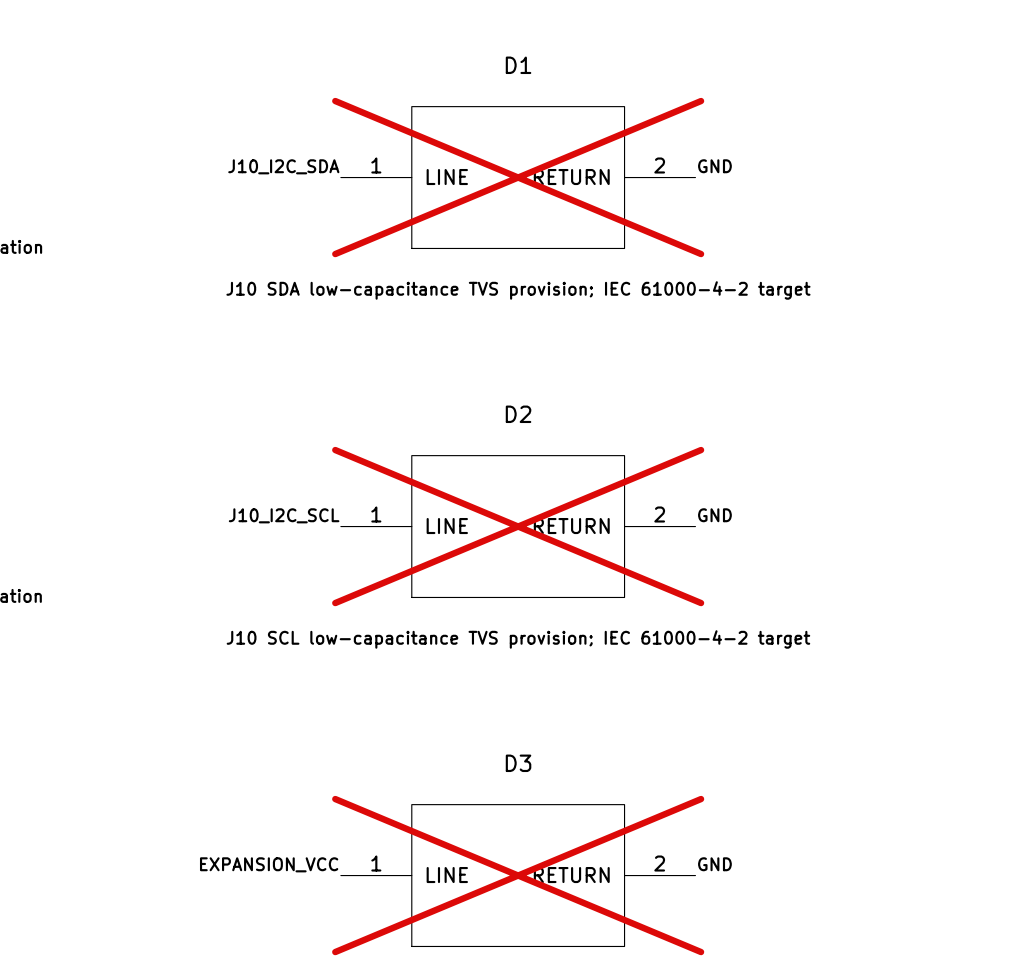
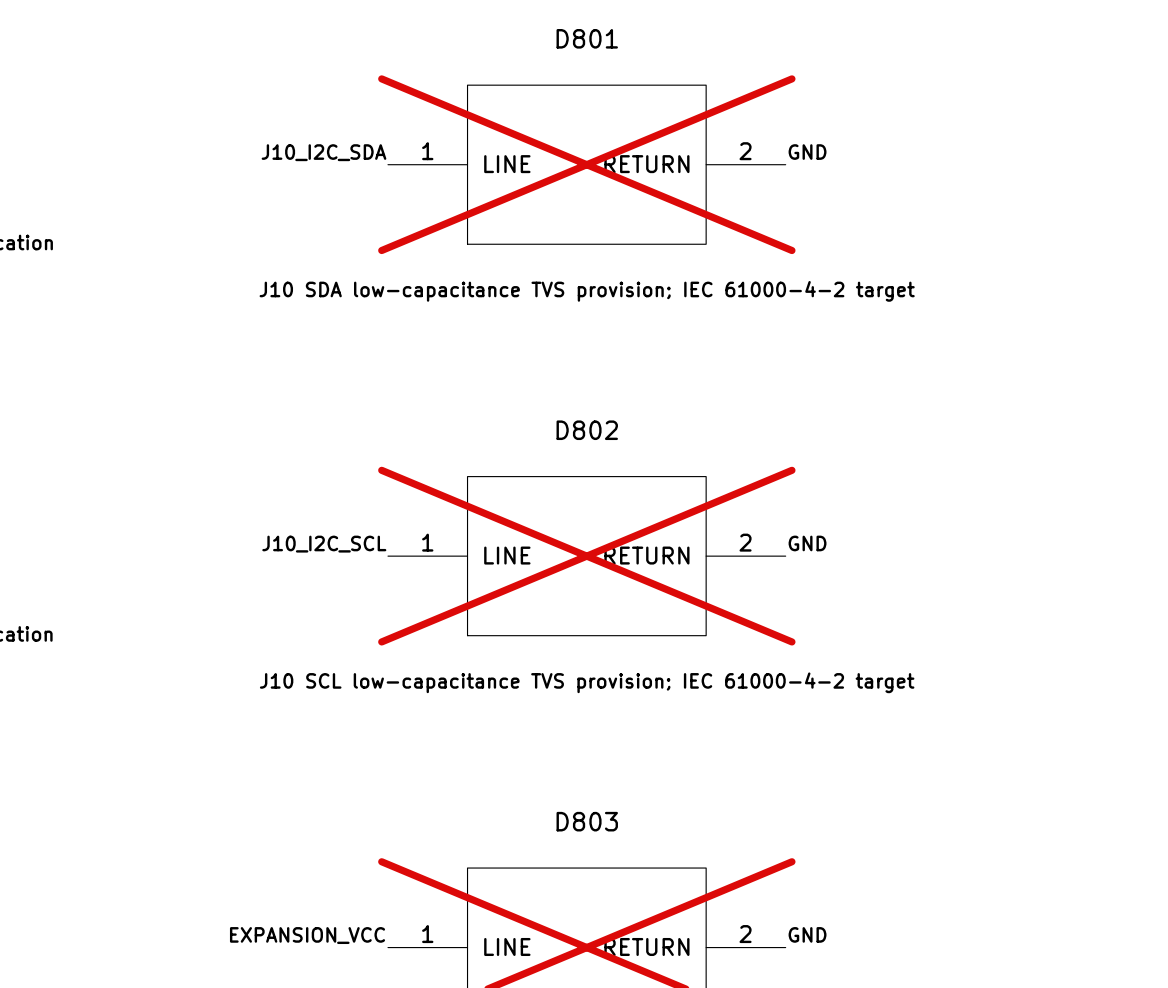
D1 name: D1 (518, 65) -> D801 (587, 38)
D2 name: D2 (518, 414) -> D802 (587, 430)
D3 name: D3 (518, 763) -> D803 (587, 821)

